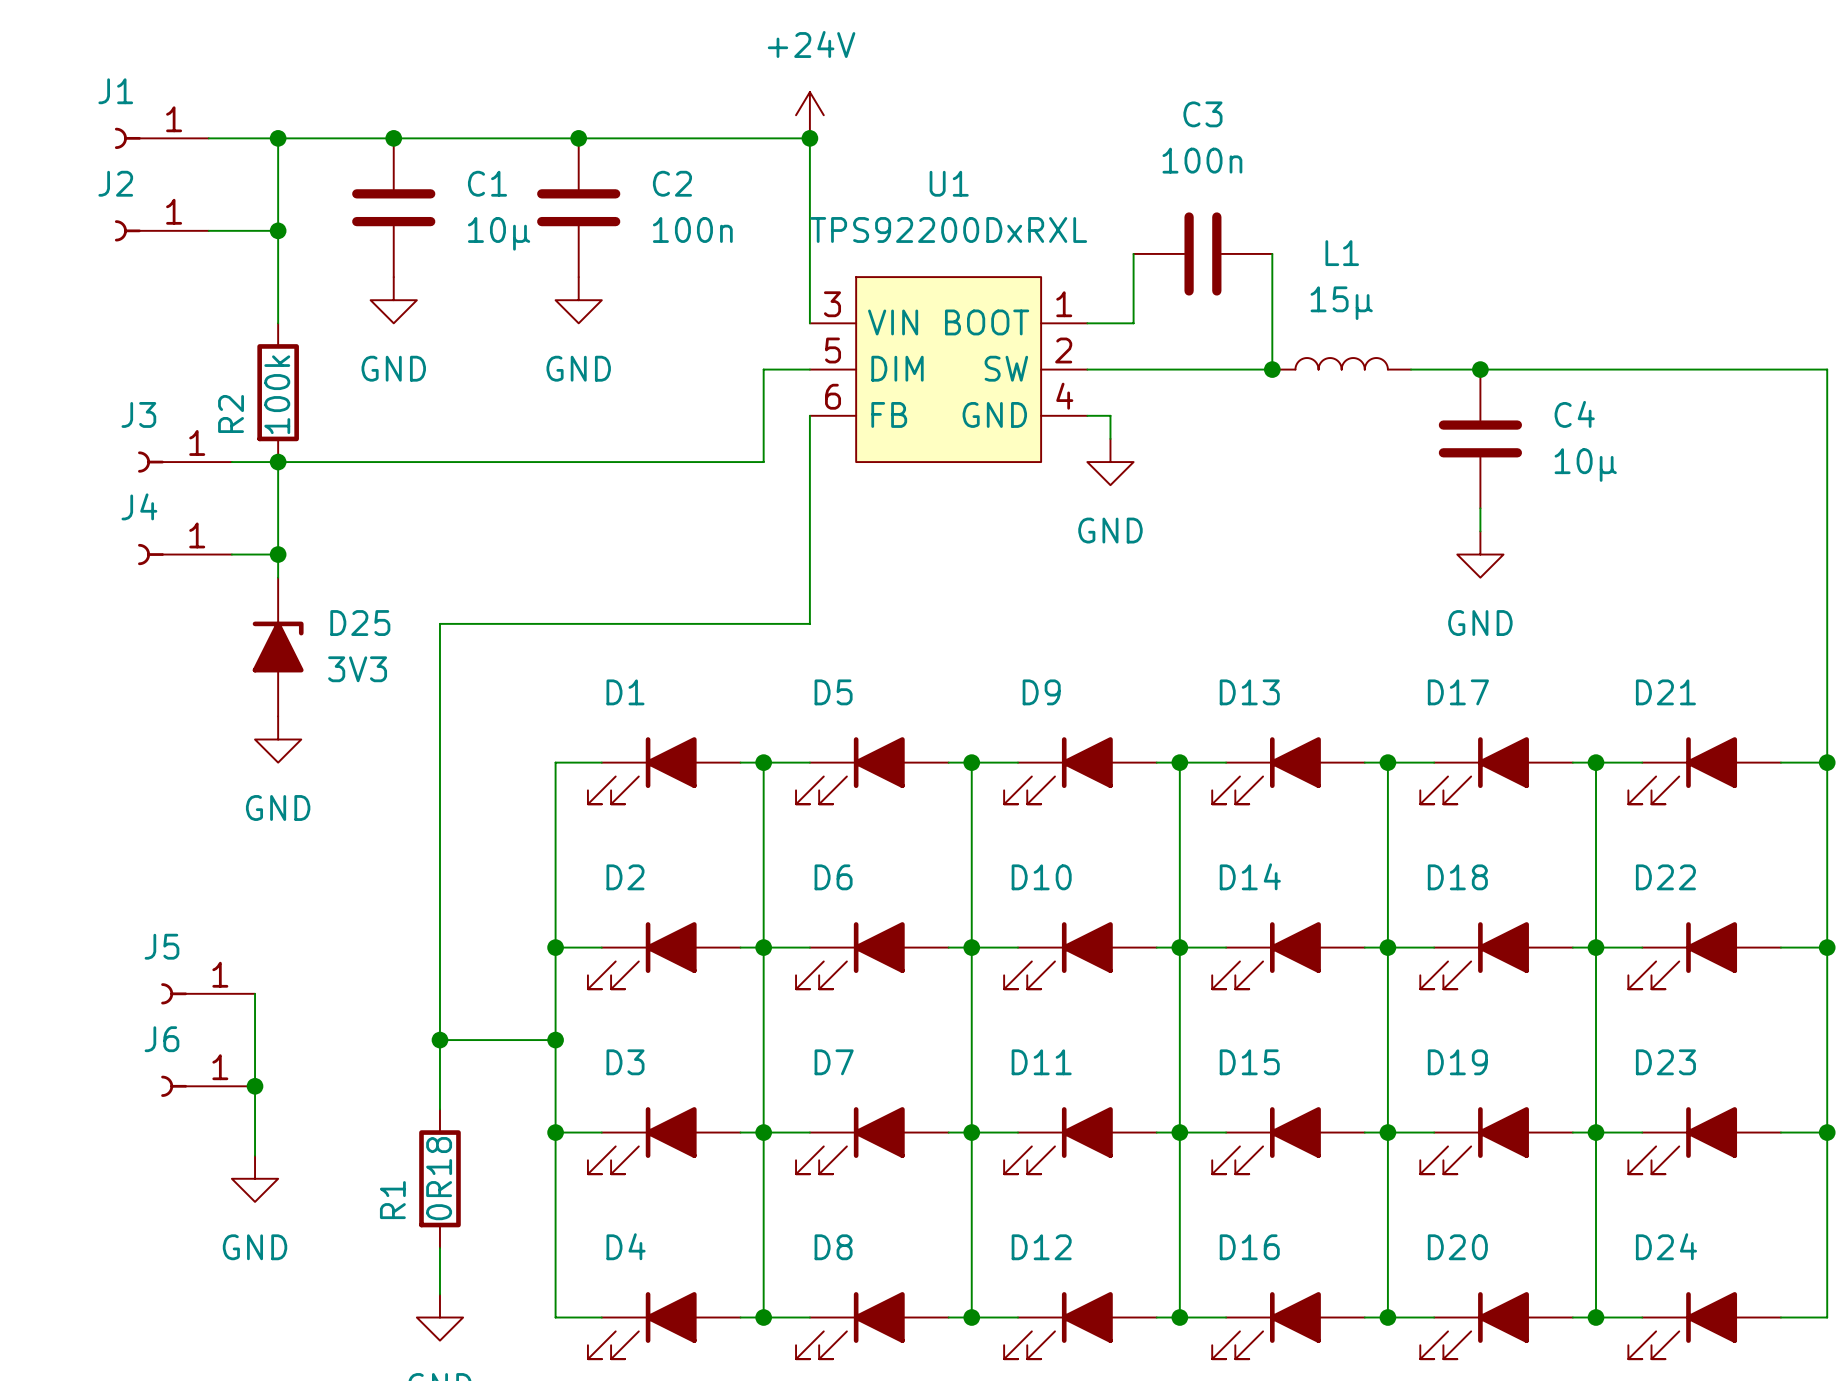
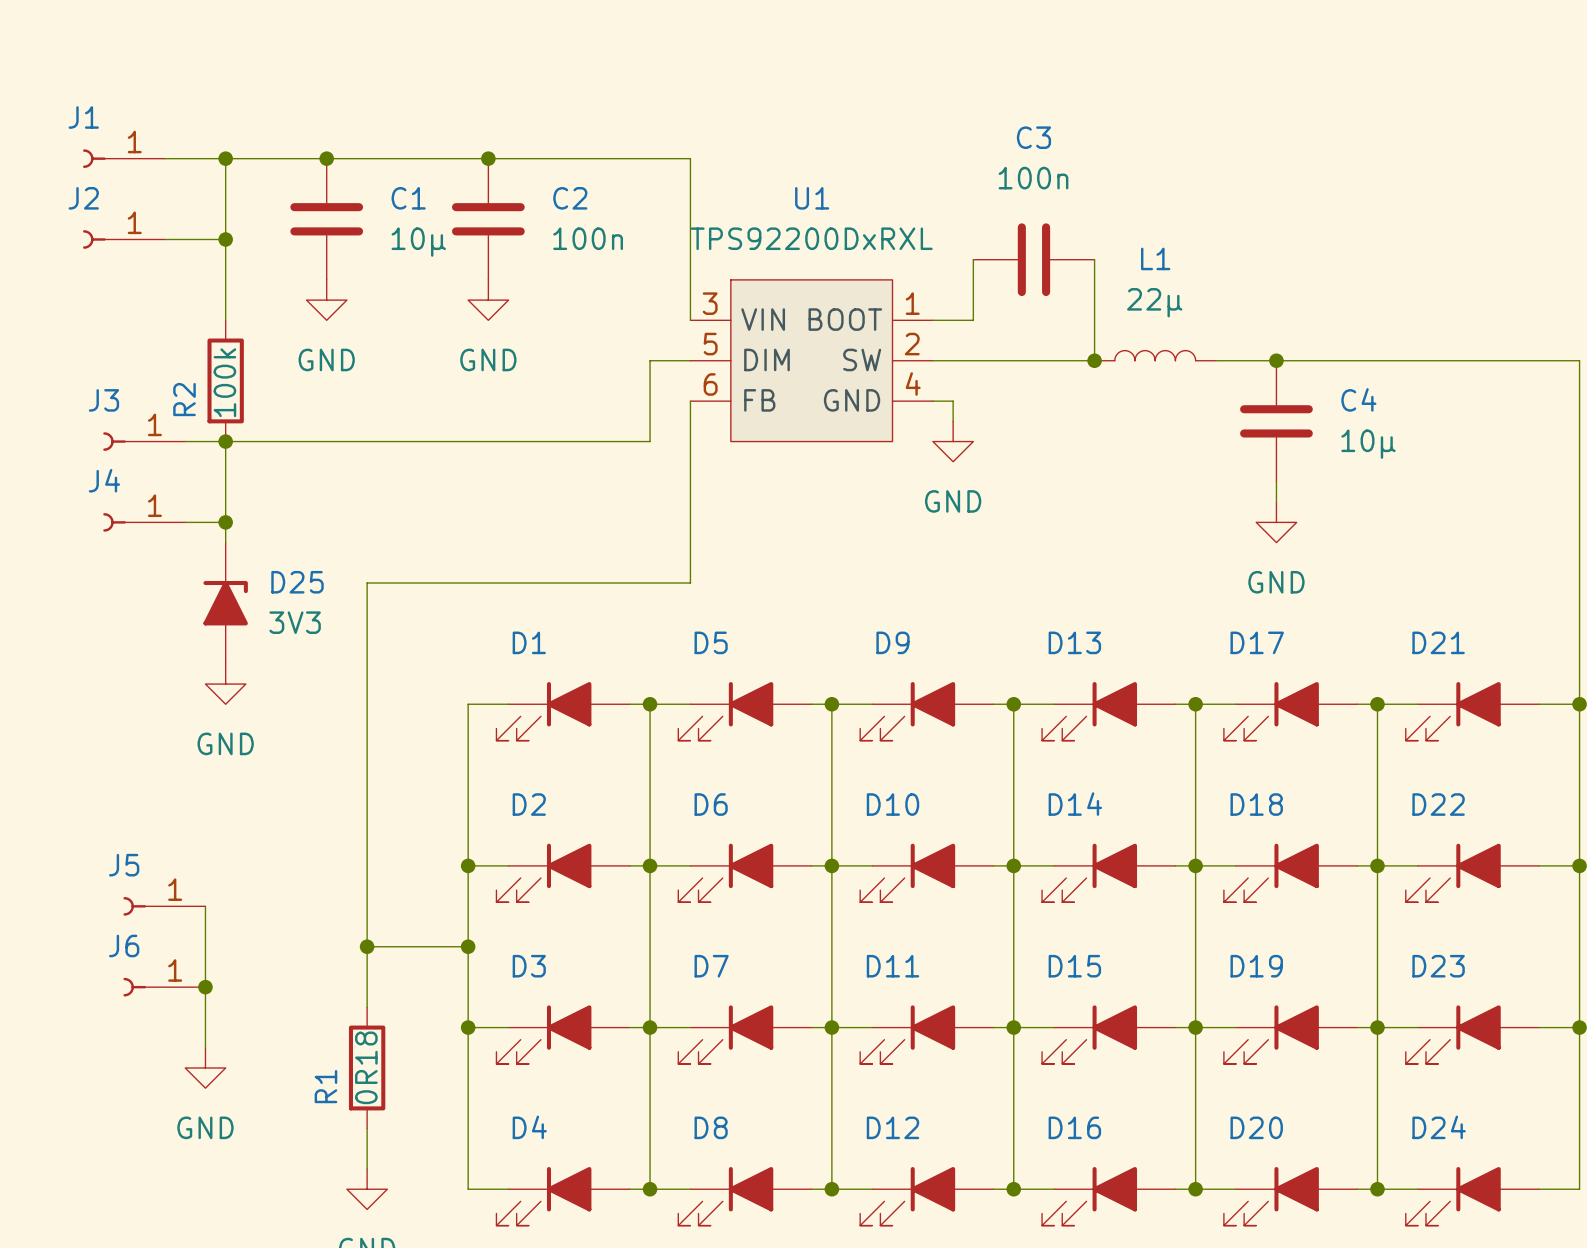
power symbol: +24V (809, 115) -> none
junction: (809, 138) -> none
L1 value: 15µ (1341, 303) -> 22µ (1154, 302)

